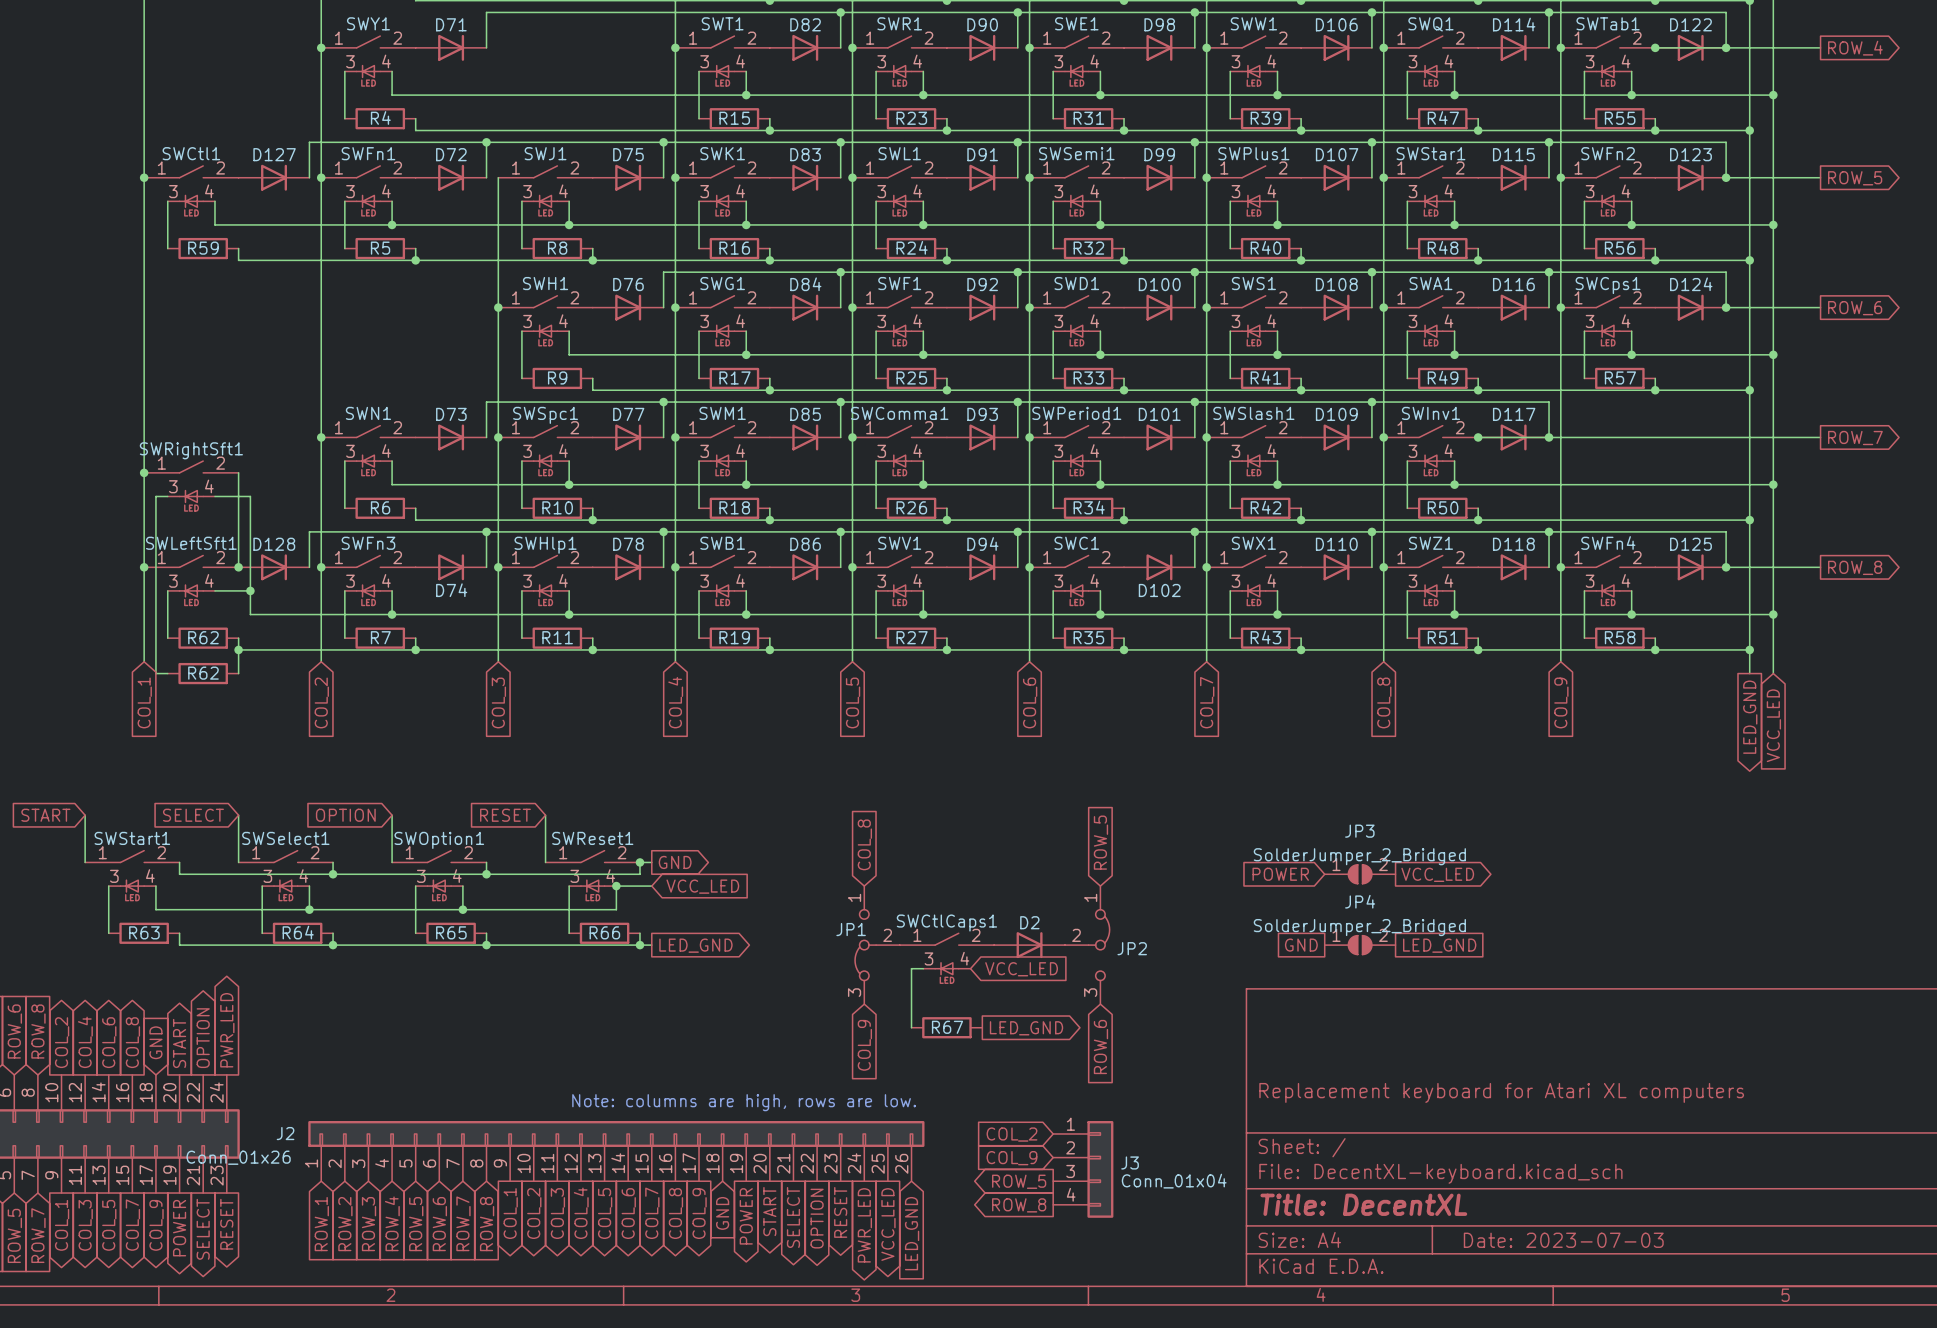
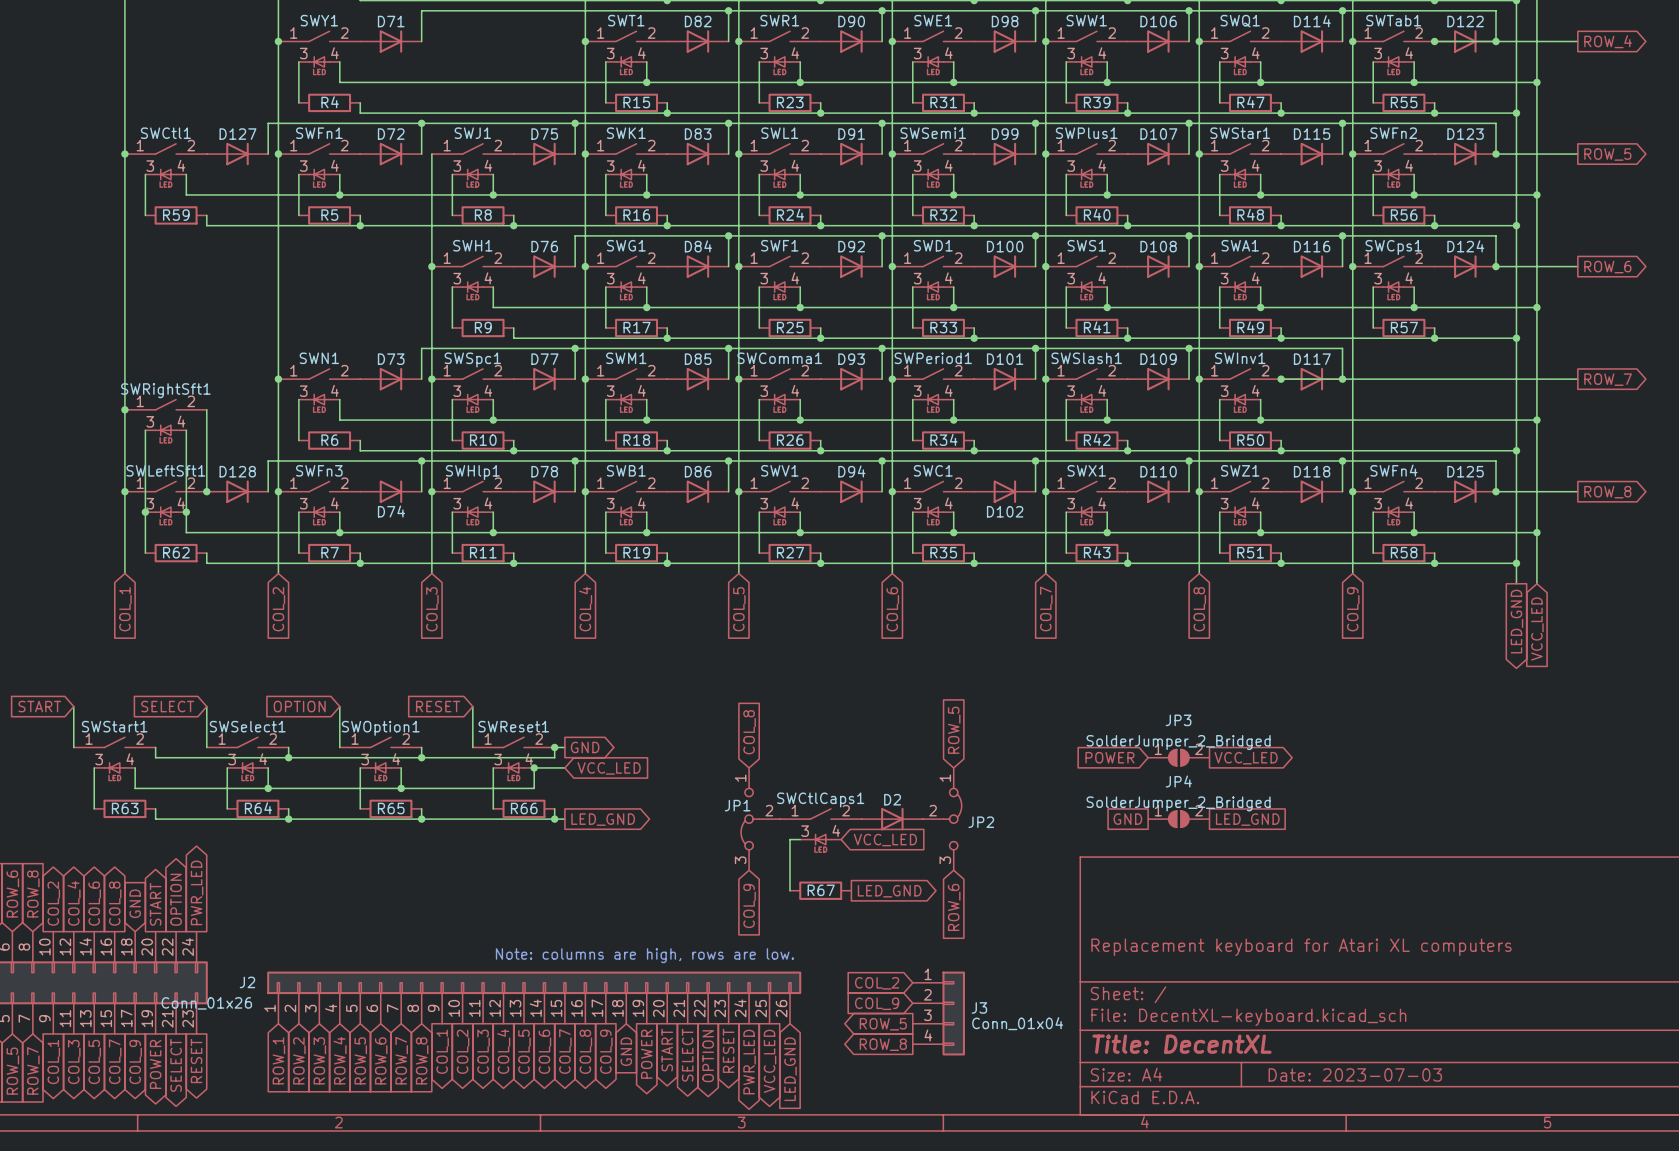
wire: (167, 496) (155, 496) (155, 673) (167, 673) -> (145, 430) (145, 512)
wire: (214, 496) (250, 496) (250, 614) -> (186, 430) (186, 532) (217, 532)
junction: none -> (145, 512)
wire: (214, 590) (250, 590) -> none
junction: none -> (186, 512)
junction: (250, 590) -> none
wire: (238, 649) (238, 673) -> none
junction: (238, 649) -> none
R62: (203, 673) -> none

